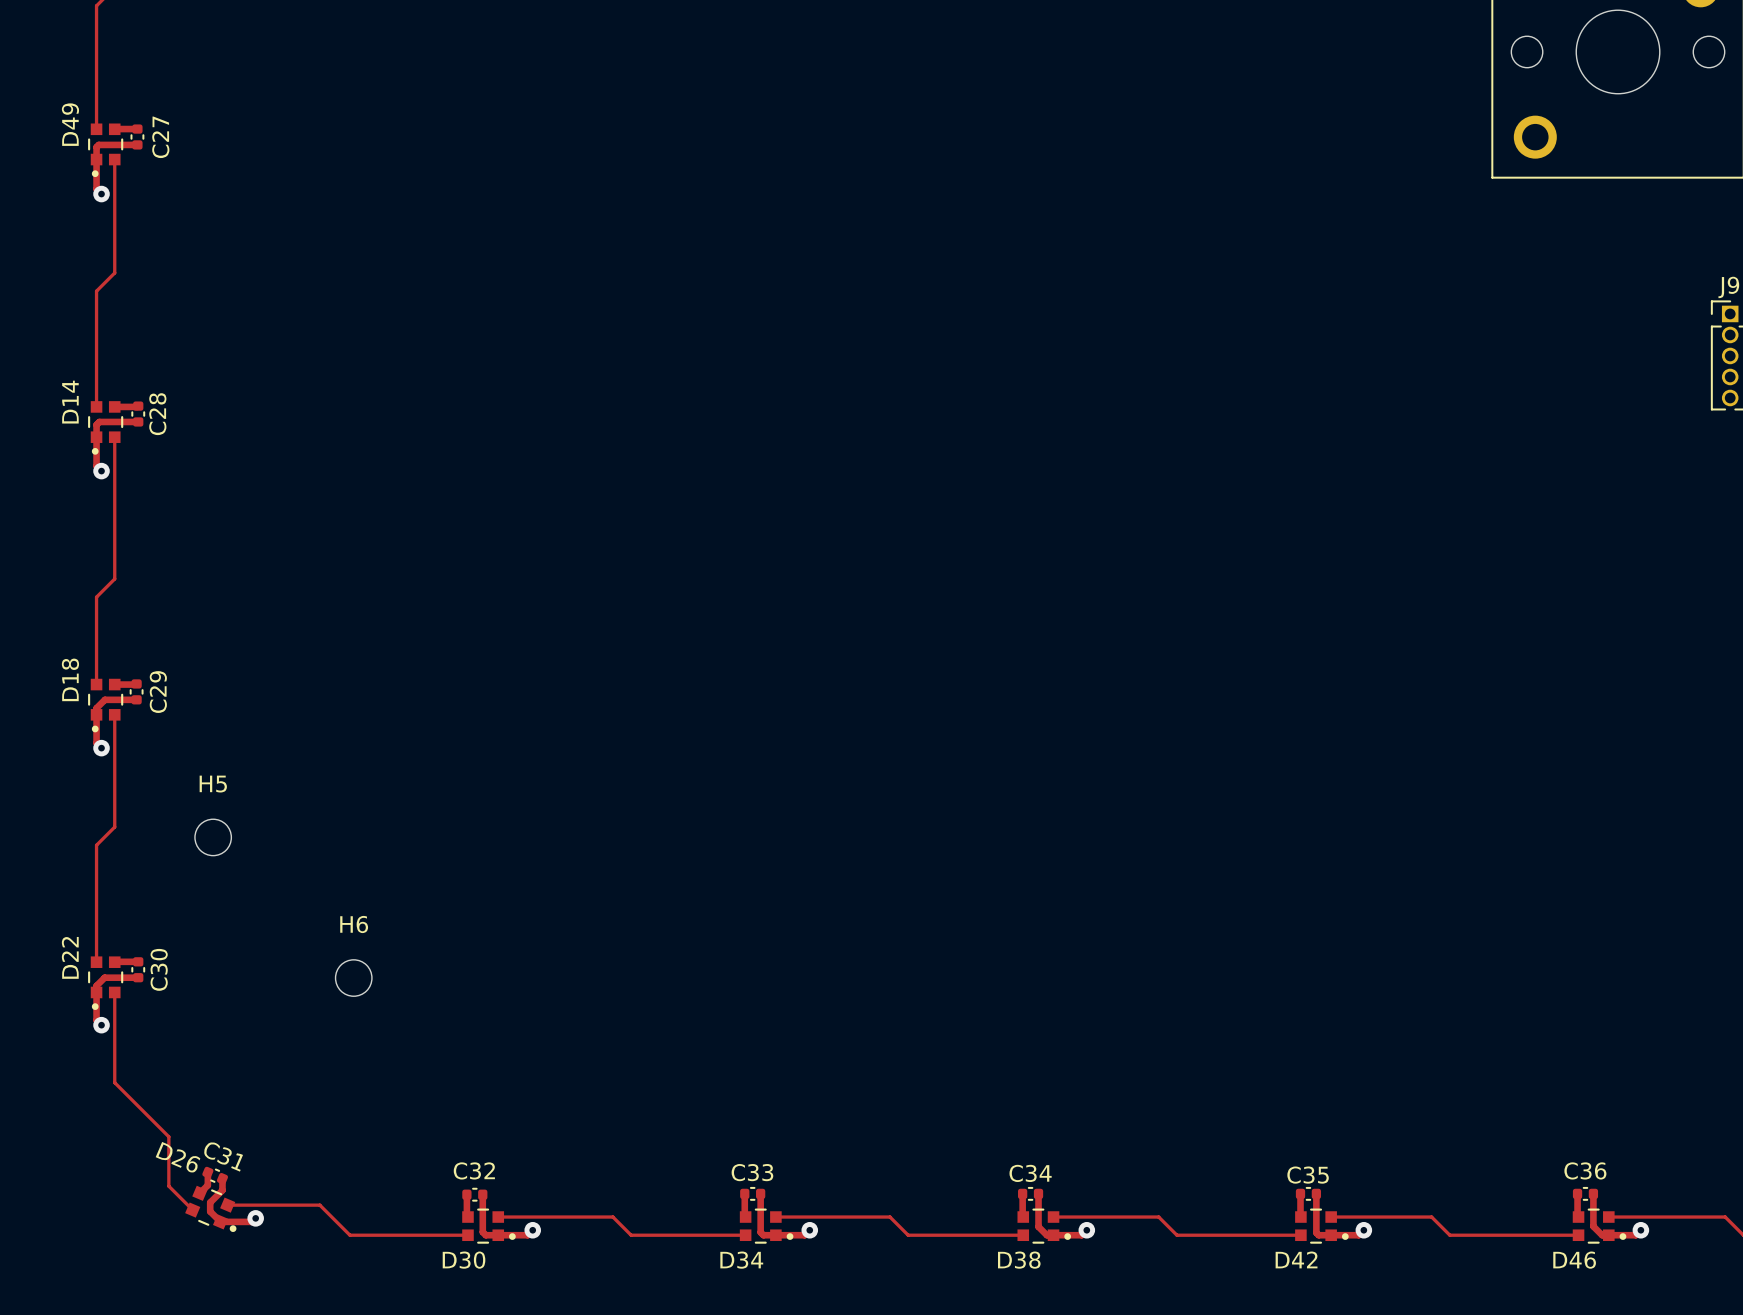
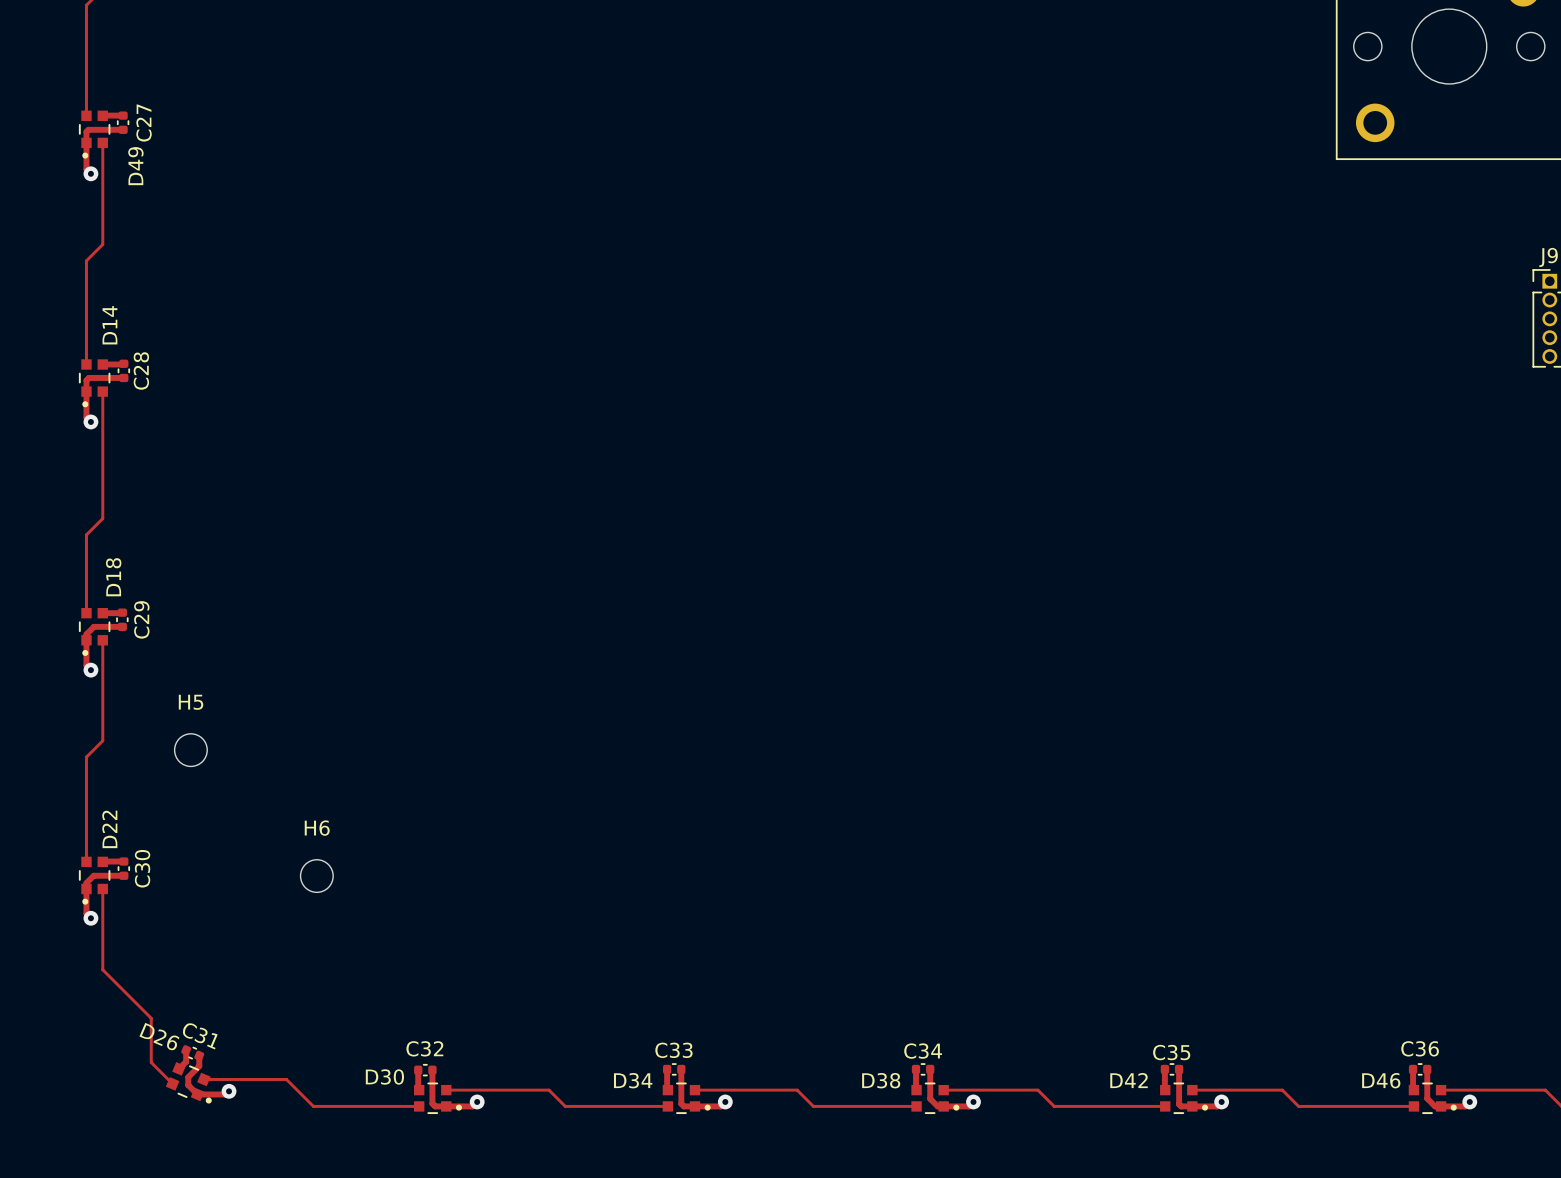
D49 name position: D49 (70, 124) -> D49 (135, 166)
D14 name position: D14 (70, 402) -> D14 (109, 325)
D18 name position: D18 (70, 679) -> D18 (113, 577)
D22 name position: D22 (70, 957) -> D22 (109, 829)
D42 name position: D42 (1296, 1259) -> D42 (1129, 1080)
D30 name position: D30 (464, 1260) -> D30 (384, 1076)
D34 name position: D34 (741, 1260) -> D34 (633, 1080)
D38 name position: D38 (1019, 1260) -> D38 (881, 1080)
D46 name position: D46 (1574, 1260) -> D46 (1381, 1080)

